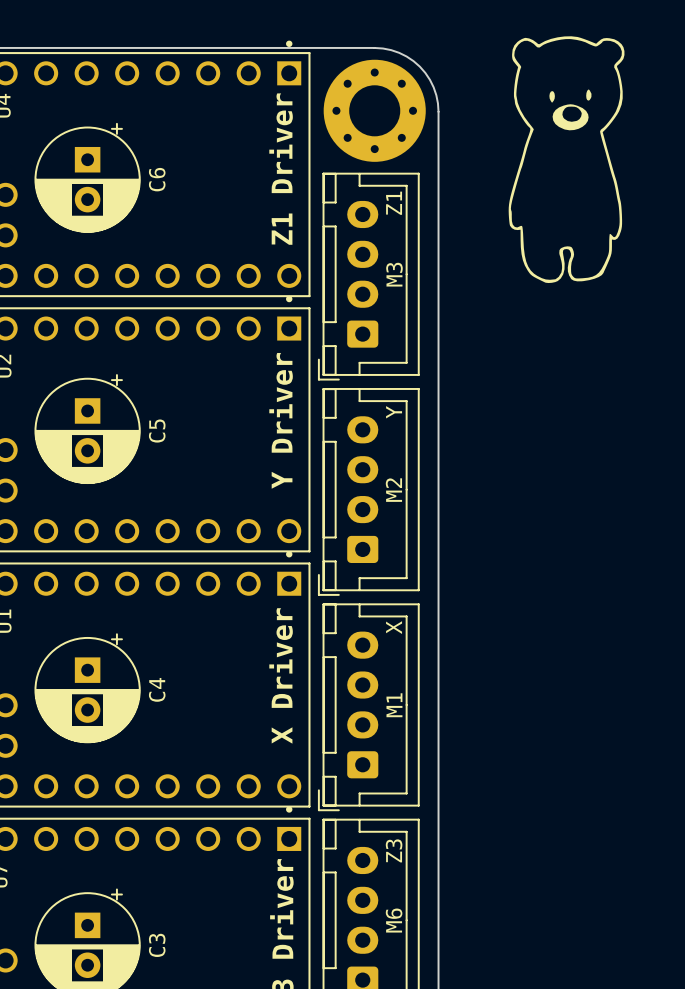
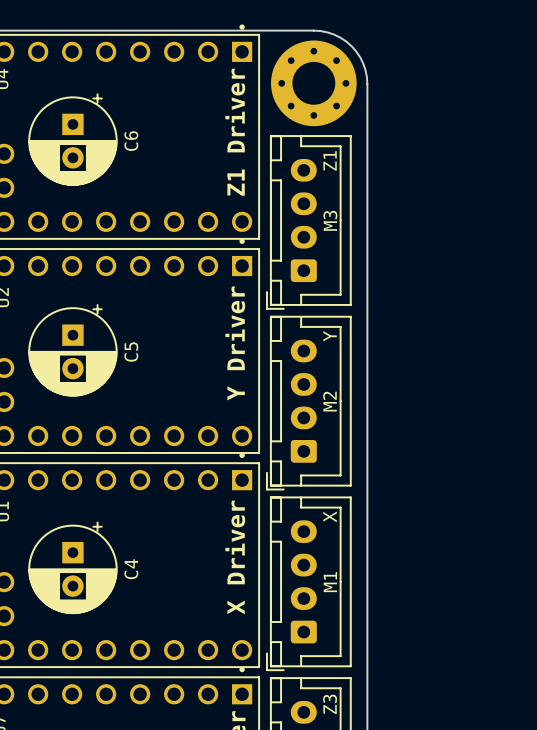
drawing: [508, 36, 625, 284] -> none

